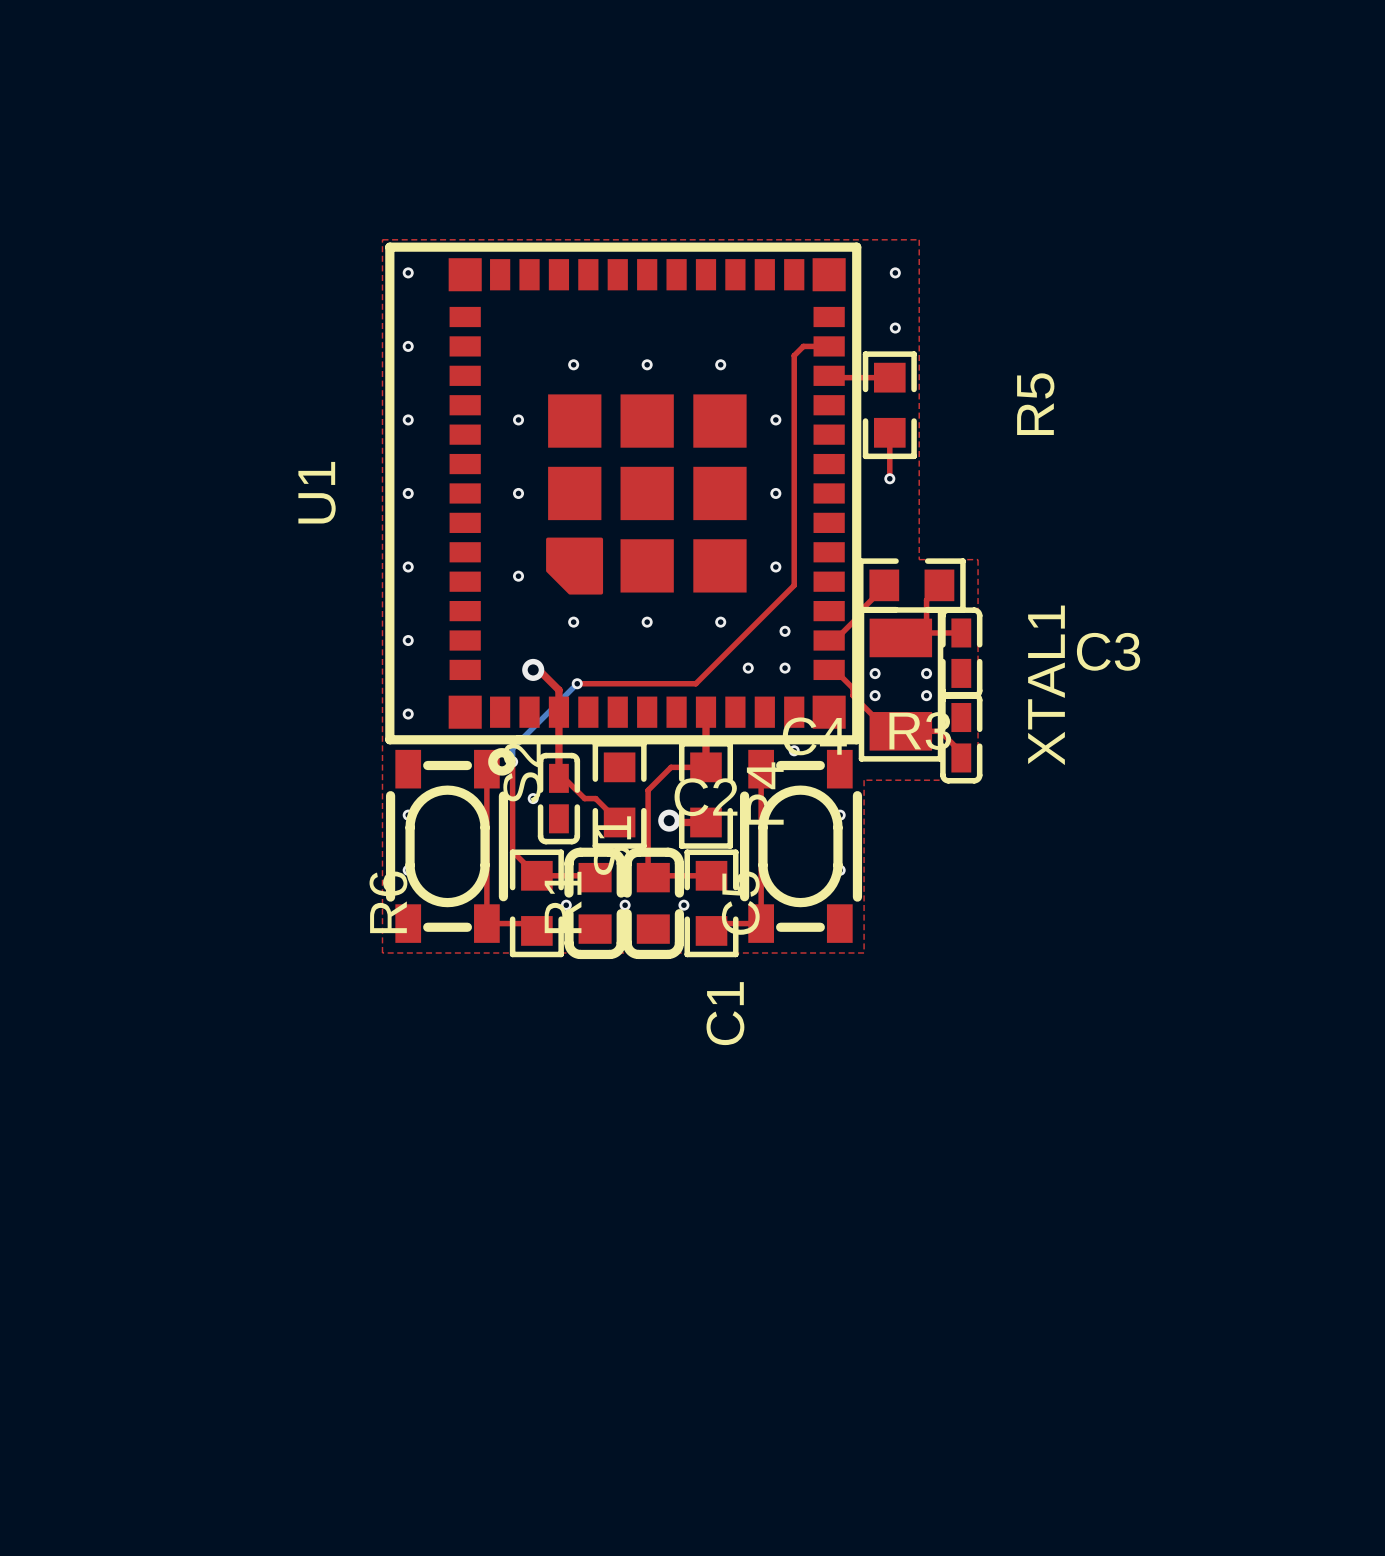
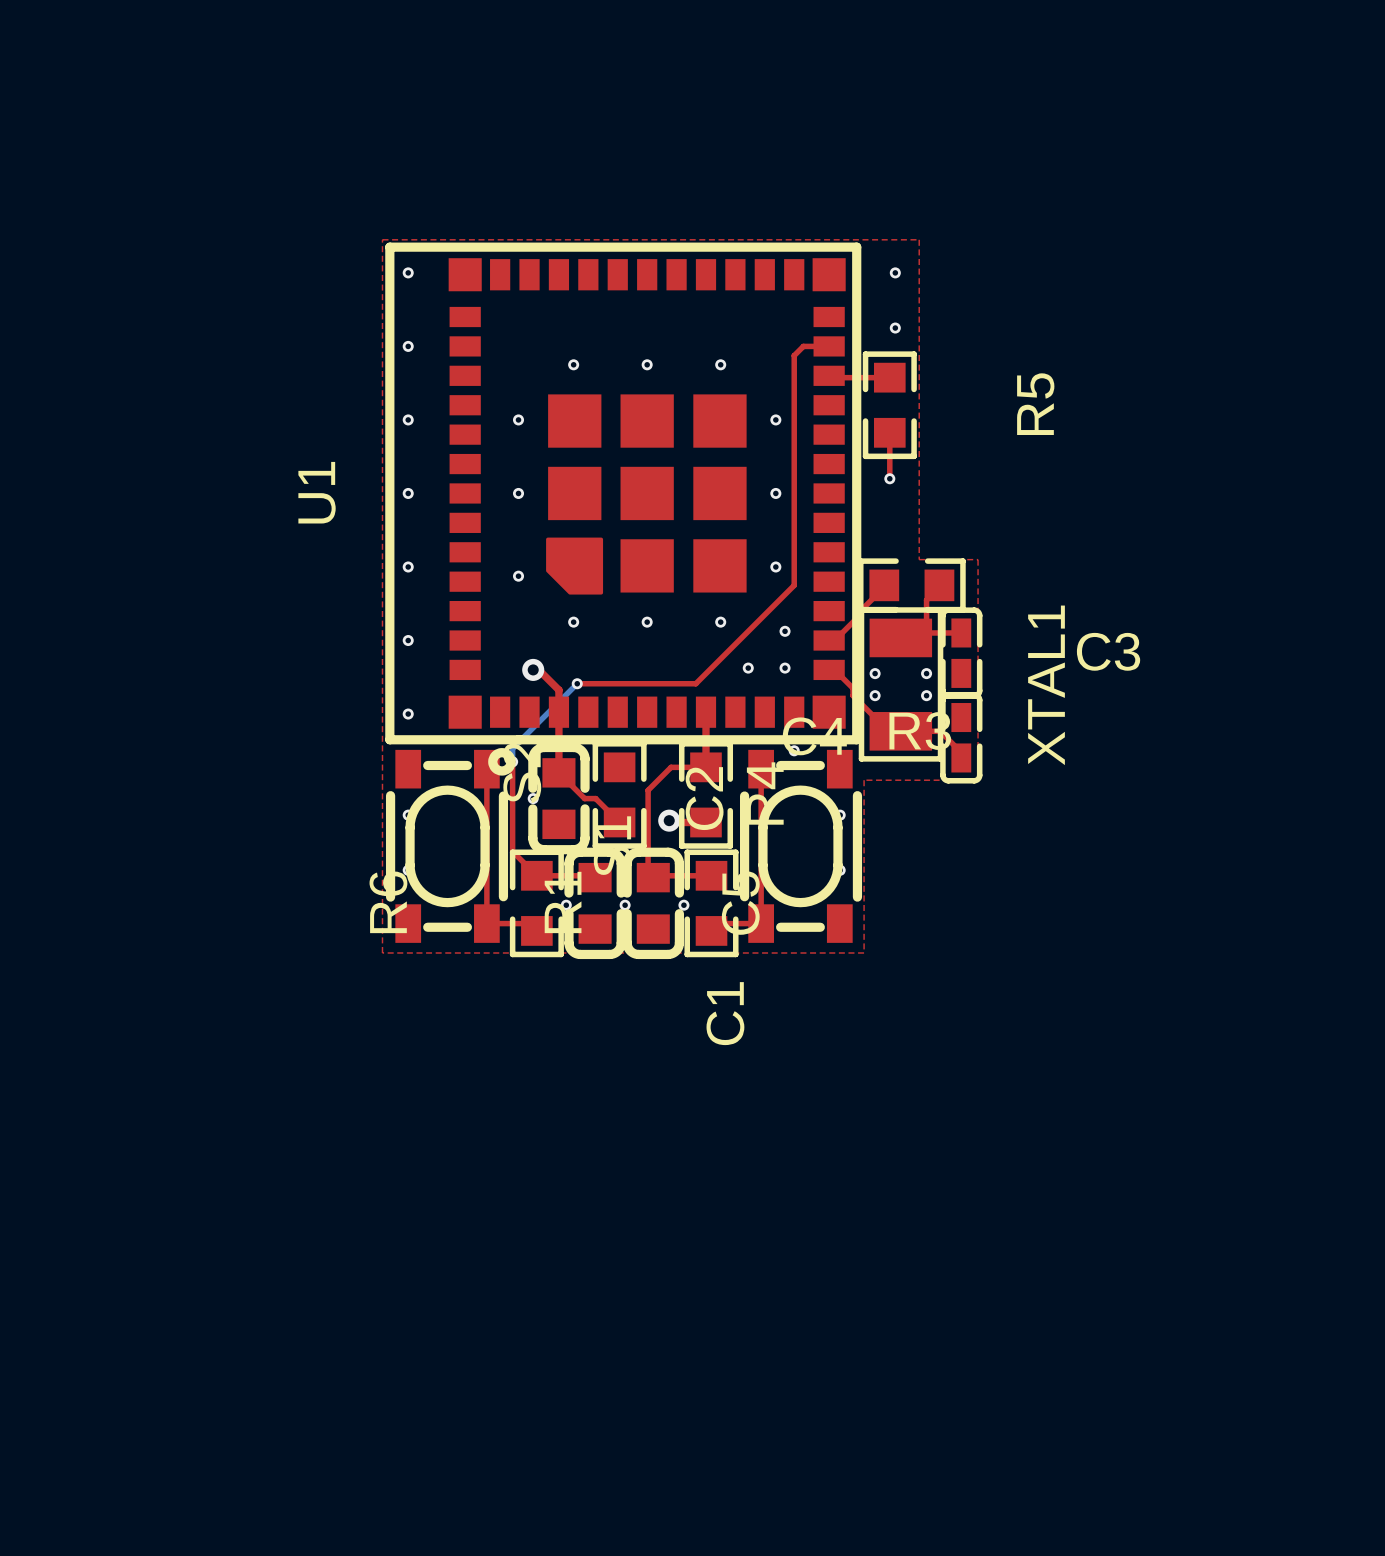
C2 footprint: [537, 752, 581, 845] -> [528, 742, 590, 855]
C2 name rotation: 0° (706, 797) -> 90° counterclockwise (704, 798)

